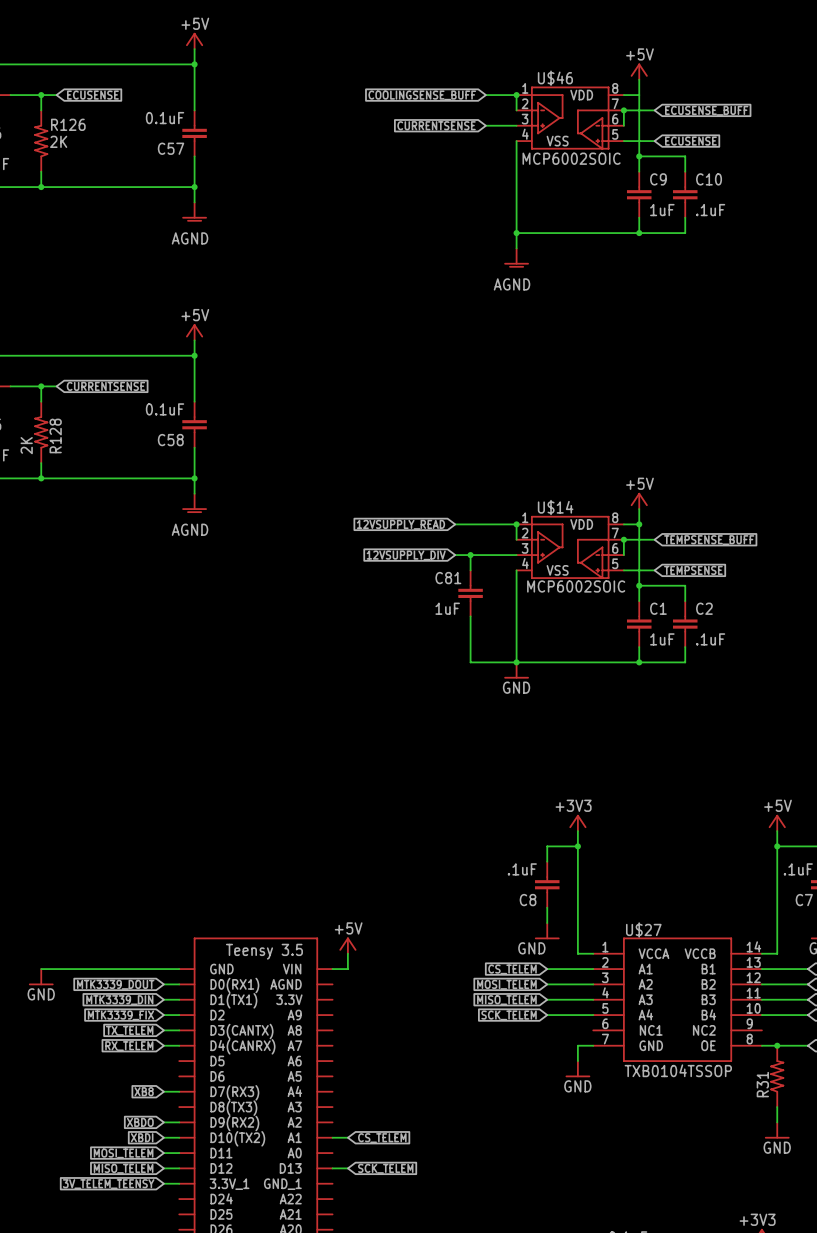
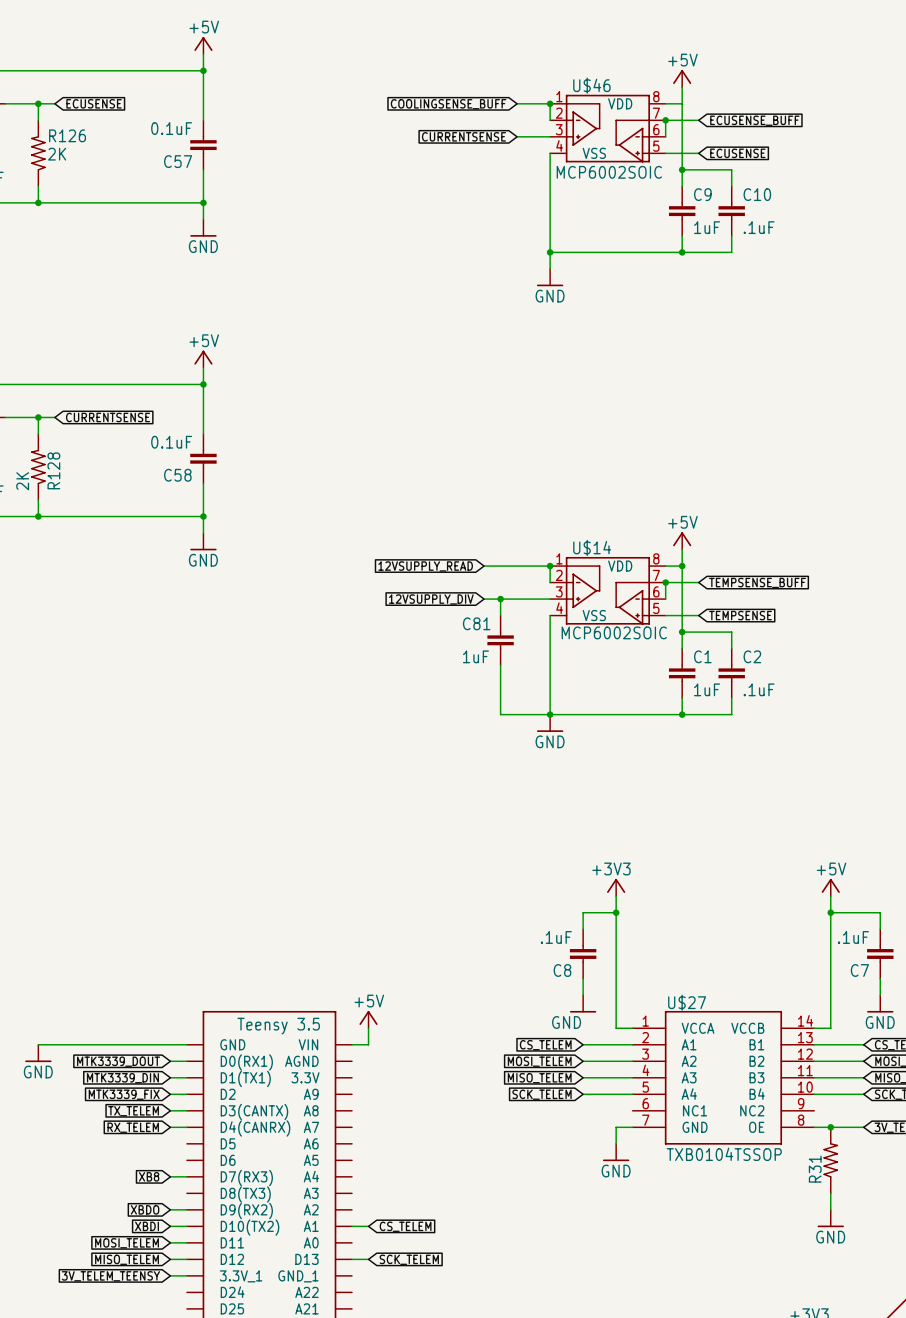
power symbol: AGND (194, 211) -> GND (203, 228)
power symbol: AGND (516, 257) -> GND (550, 277)
power symbol: AGND (194, 503) -> GND (203, 541)

